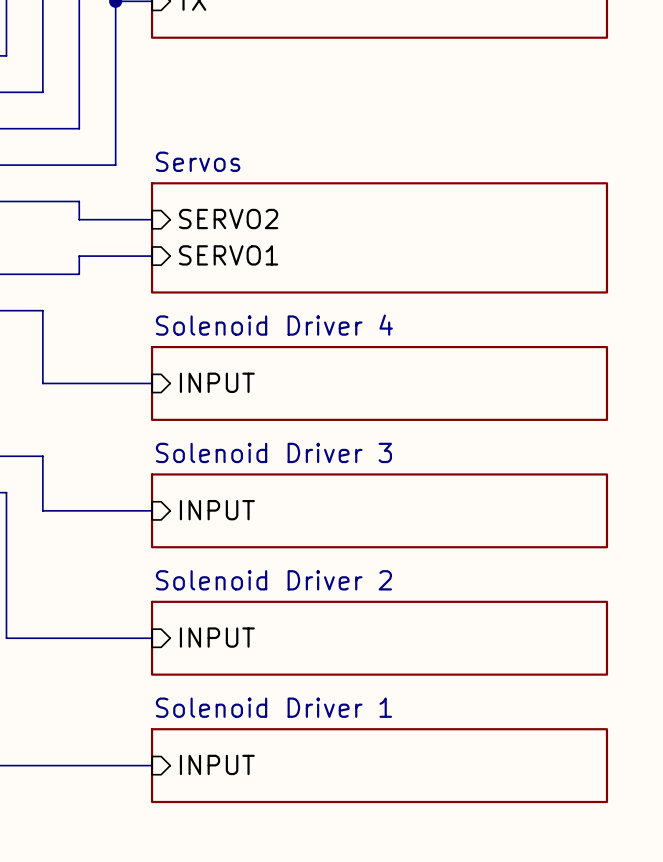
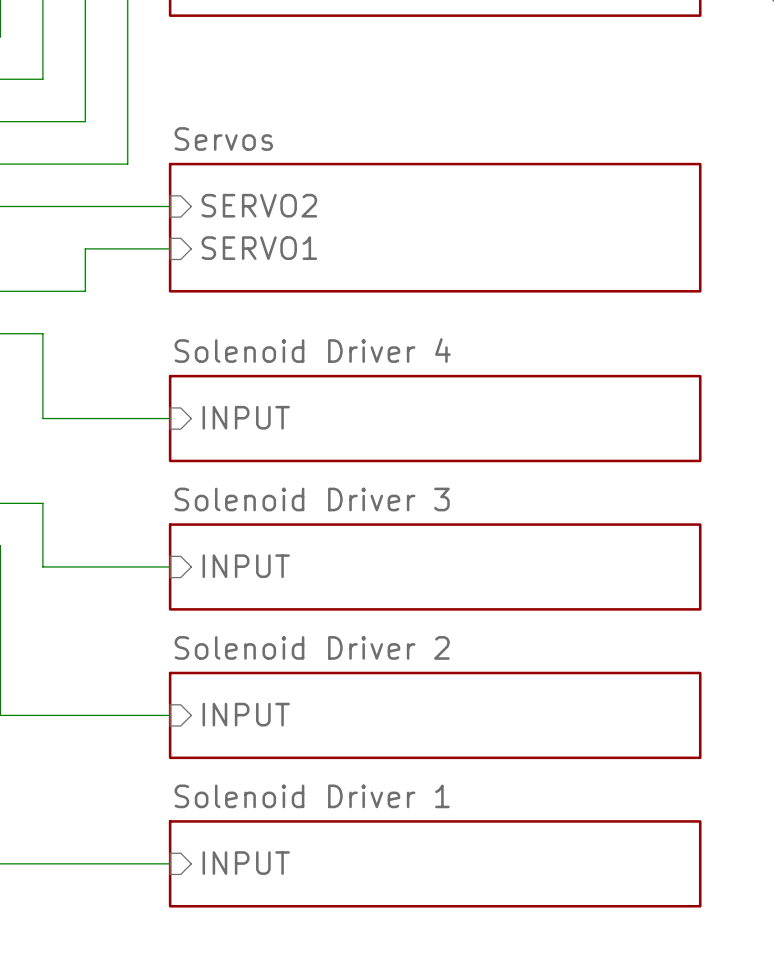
wire: (79, 201) (79, 219) (152, 219) -> (85, 206) (170, 206)
sheet pin position: SERVO2 (228, 219) -> SERVO2 (259, 205)
sheet Servos position: (379, 237) -> (435, 227)
sheet pin position: SERVO1 (228, 255) -> SERVO1 (259, 248)
wire: (79, 256) (152, 256) -> (85, 270) (85, 248) (170, 248)

